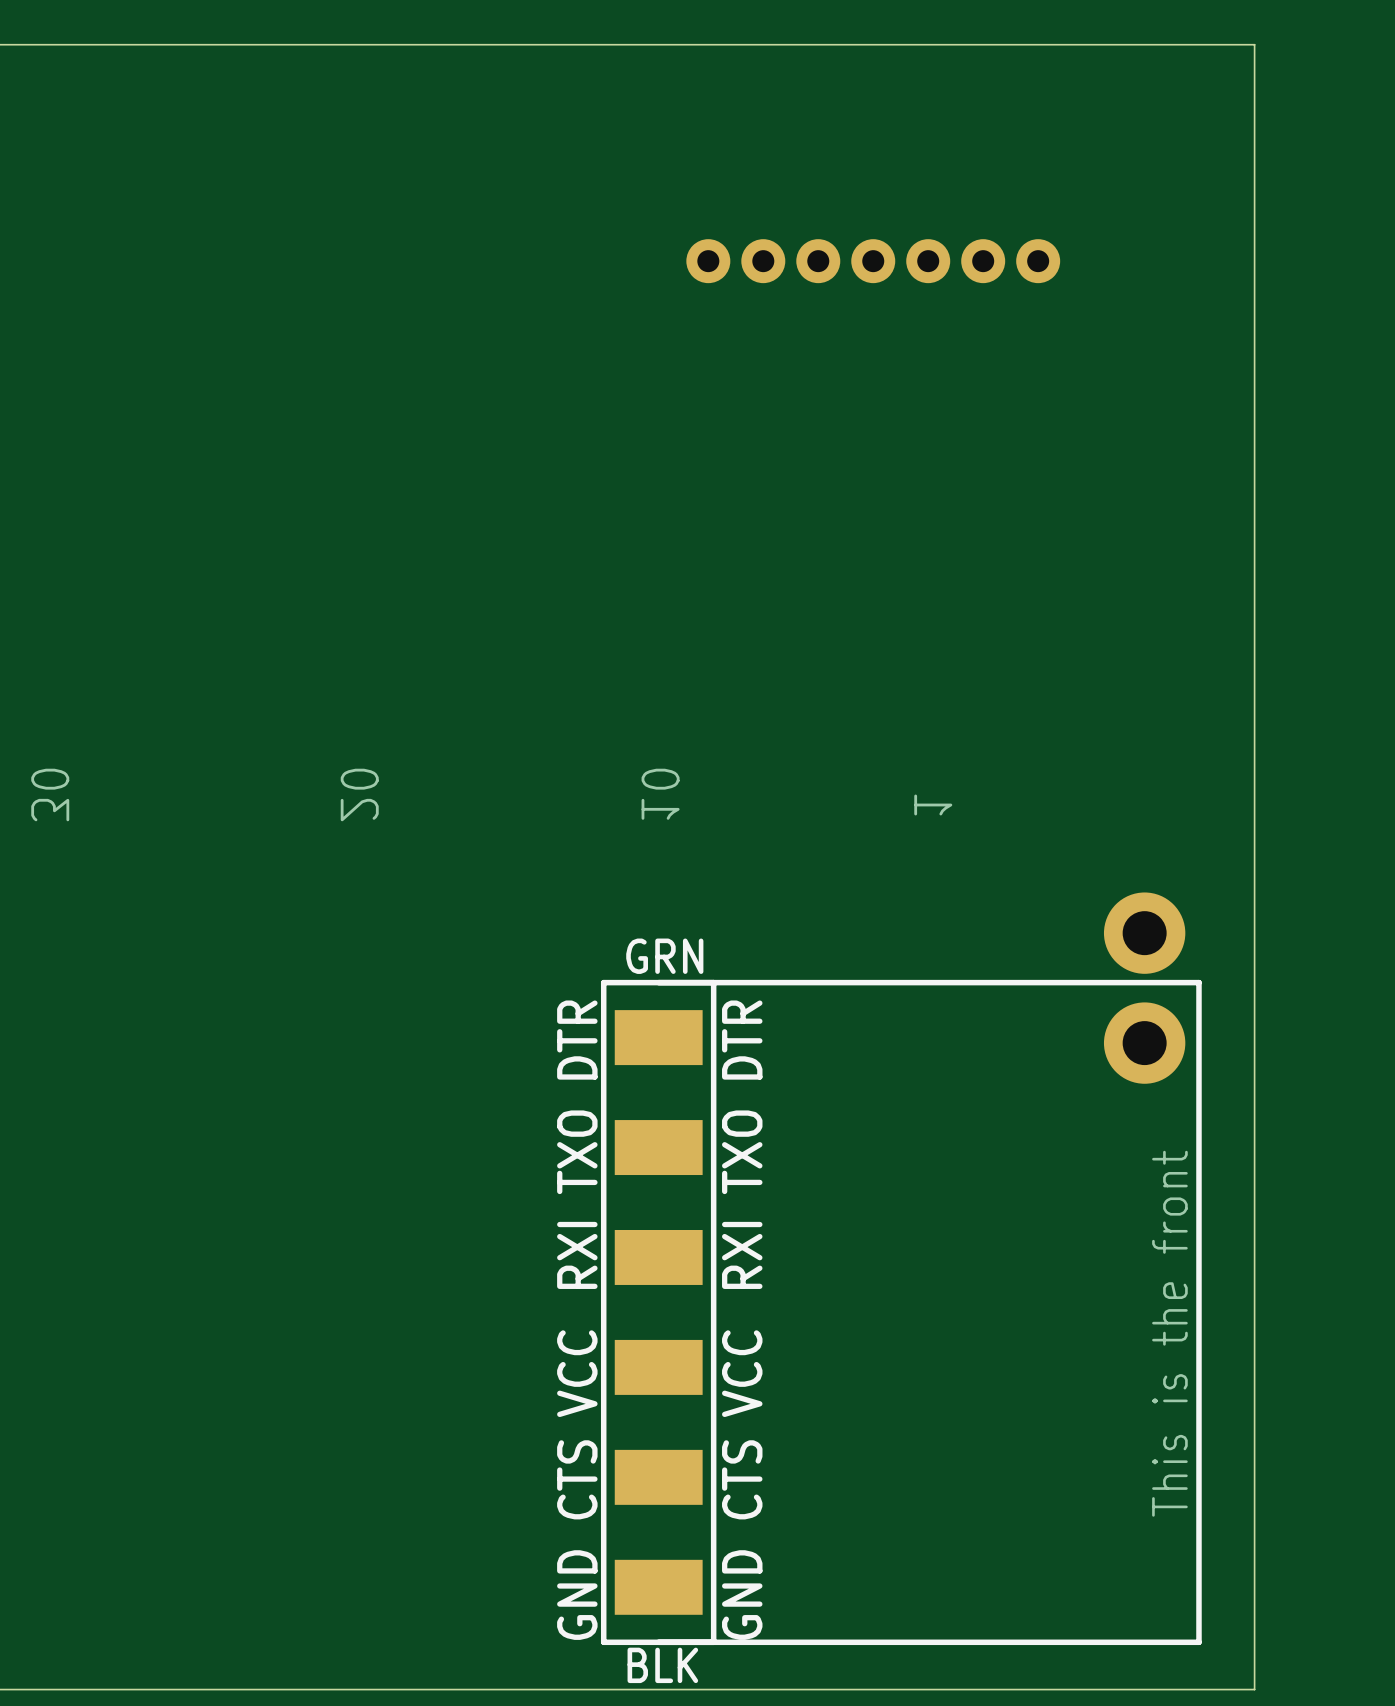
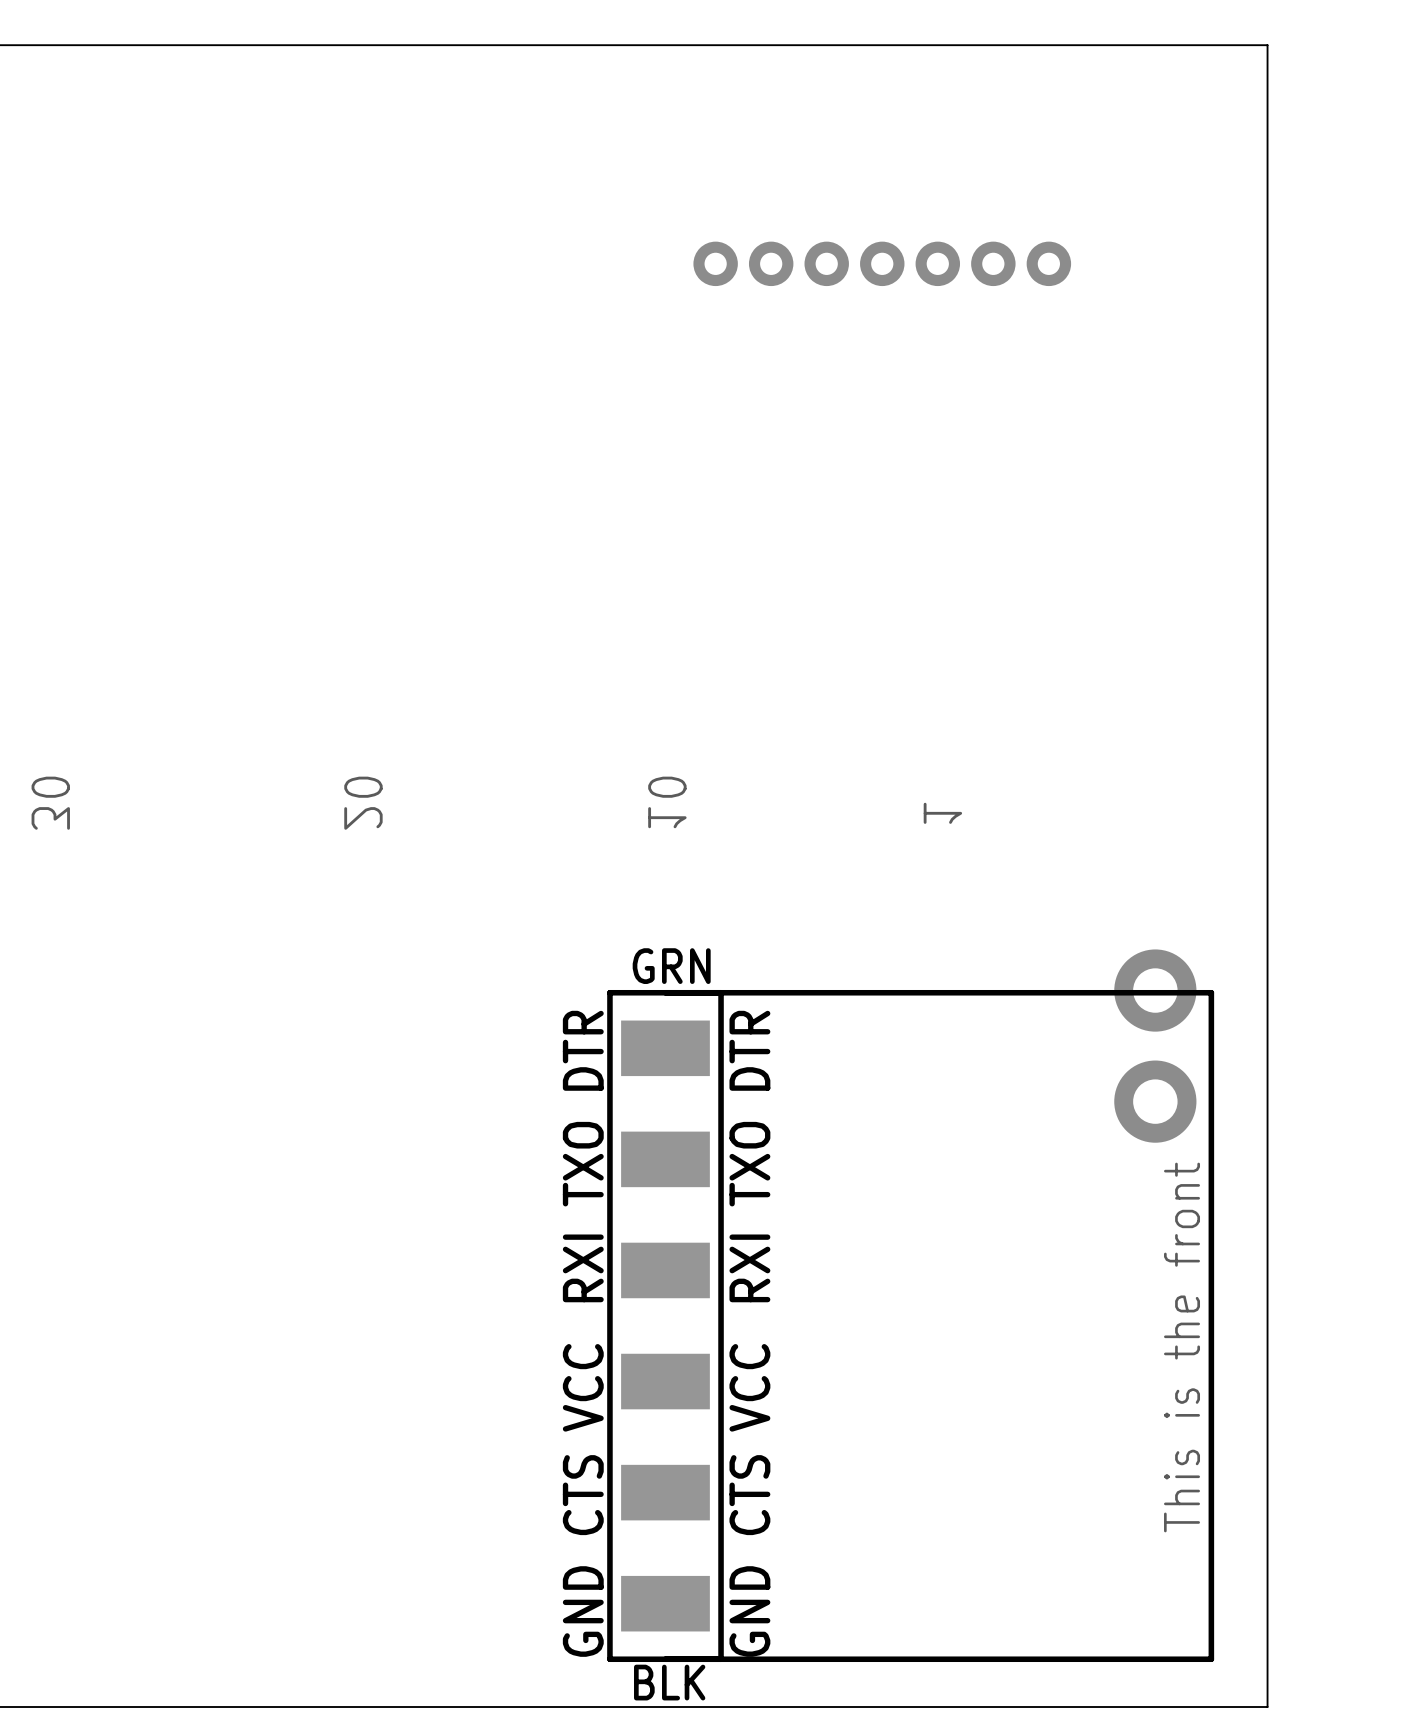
part position: (1144, 988) -> (1155, 1046)

